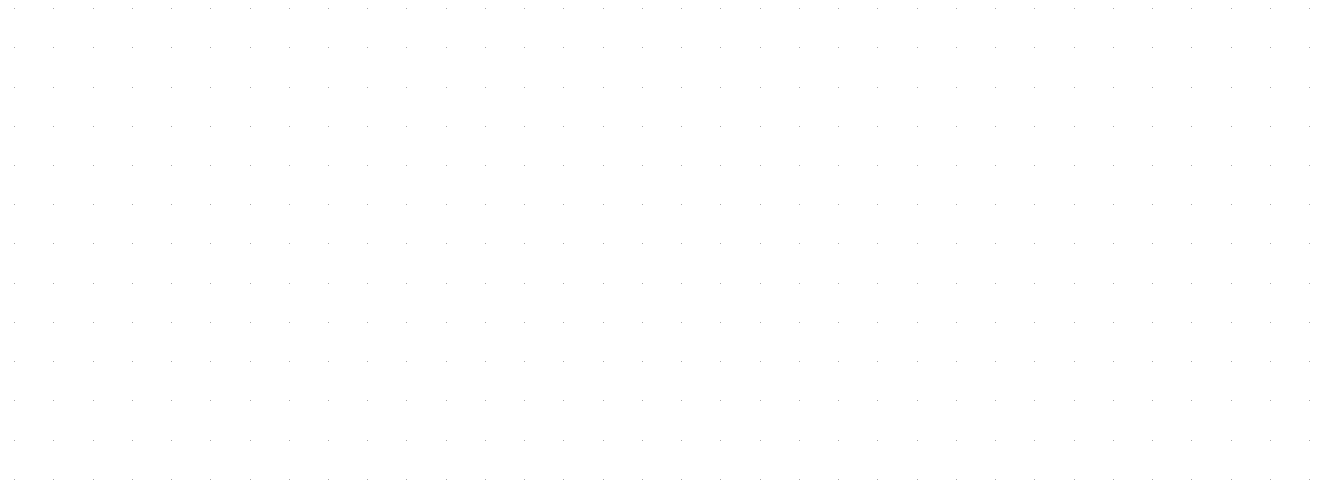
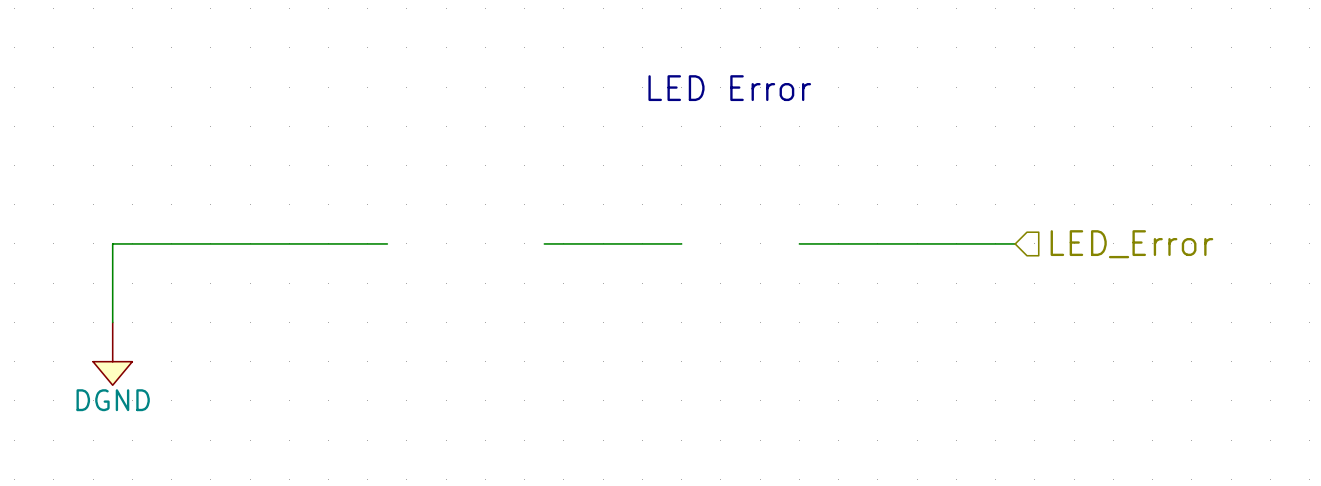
text: none -> LED Error (729, 88)
wire: none -> (387, 243) (112, 243) (112, 322)
wire: none -> (544, 243) (681, 243)
wire: none -> (799, 243) (1015, 243)
hierarchical label: none -> LED_Error (1131, 244)
power symbol: none -> DGND (112, 353)

